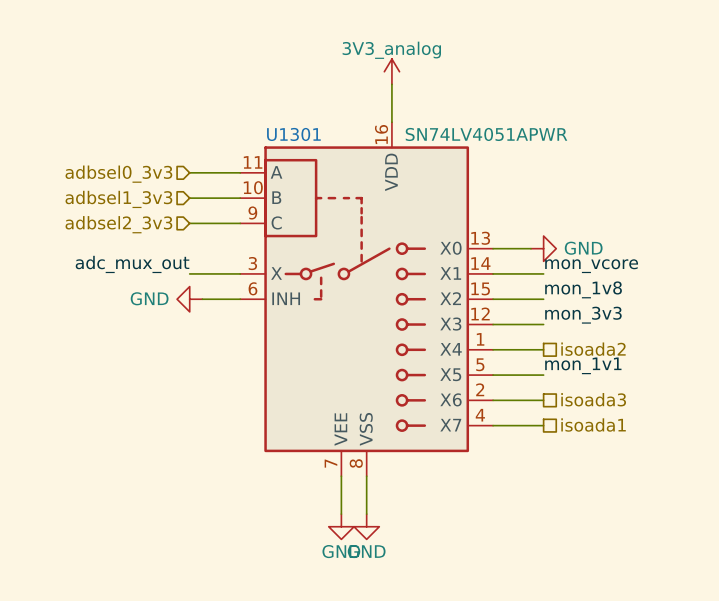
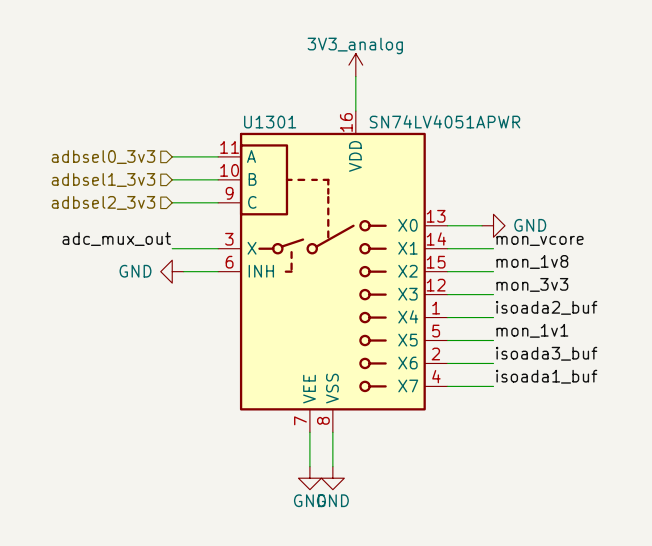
label: none -> isoada2_buf (546, 307)
hierarchical label: isoada2 (593, 349) -> none
label: none -> isoada3_buf (546, 353)
hierarchical label: isoada3 (593, 399) -> none
label: none -> isoada1_buf (546, 376)
hierarchical label: isoada1 (593, 425) -> none

